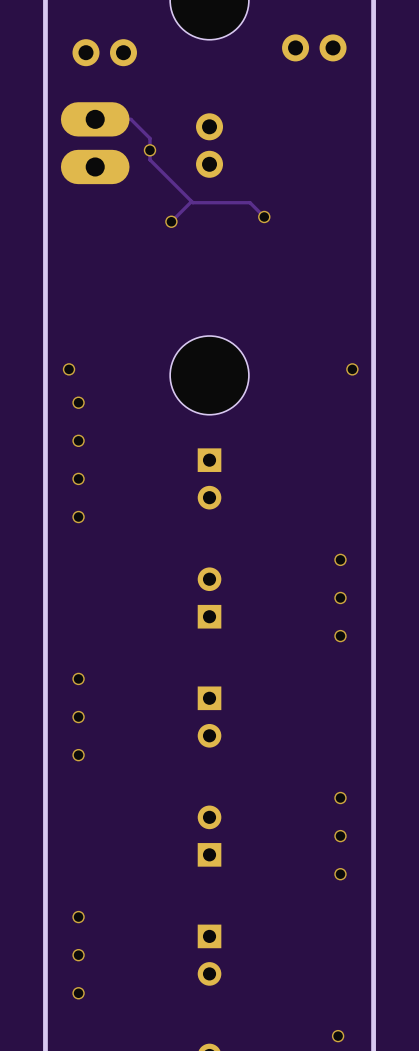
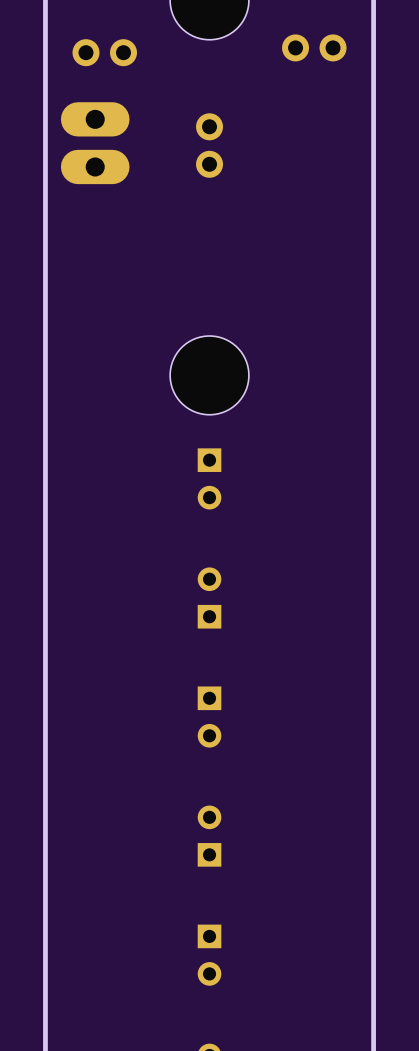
track: (95, 119) (130, 119) (149, 138) (149, 159) (192, 202) (250, 202) (264, 216) -> none
via: (149, 150) -> none
track: (191, 201) (171, 221) -> none
via: (264, 216) -> none
via: (171, 221) -> none
via: (69, 369) -> none
via: (352, 369) -> none
via: (78, 402) -> none
via: (78, 440) -> none
via: (78, 478) -> none
via: (78, 517) -> none
via: (340, 559) -> none
via: (340, 597) -> none
via: (340, 636) -> none
via: (78, 678) -> none
via: (78, 717) -> none
via: (78, 755) -> none
via: (340, 798) -> none
via: (340, 836) -> none
via: (340, 874) -> none
via: (78, 917) -> none
via: (78, 955) -> none
via: (78, 993) -> none
via: (338, 1036) -> none

